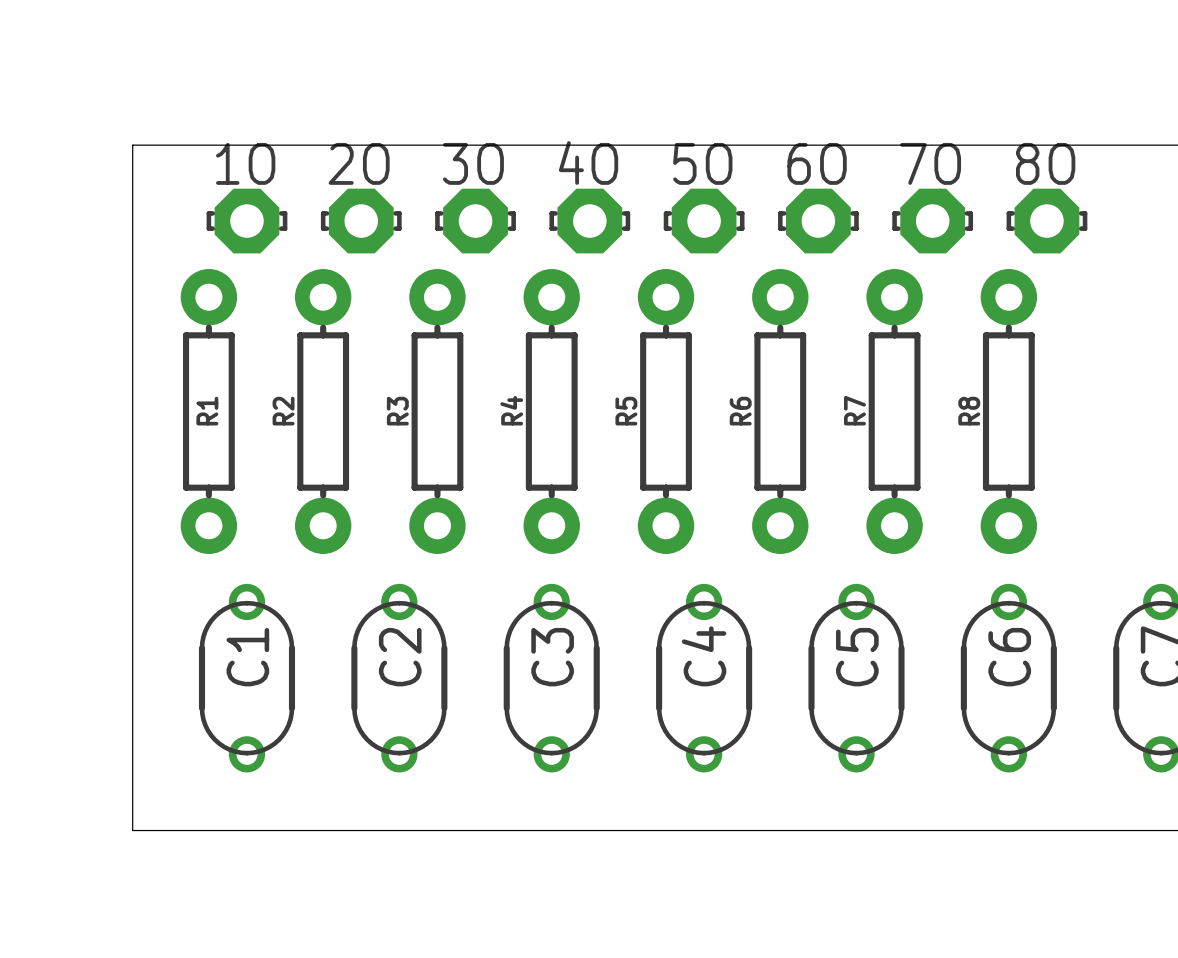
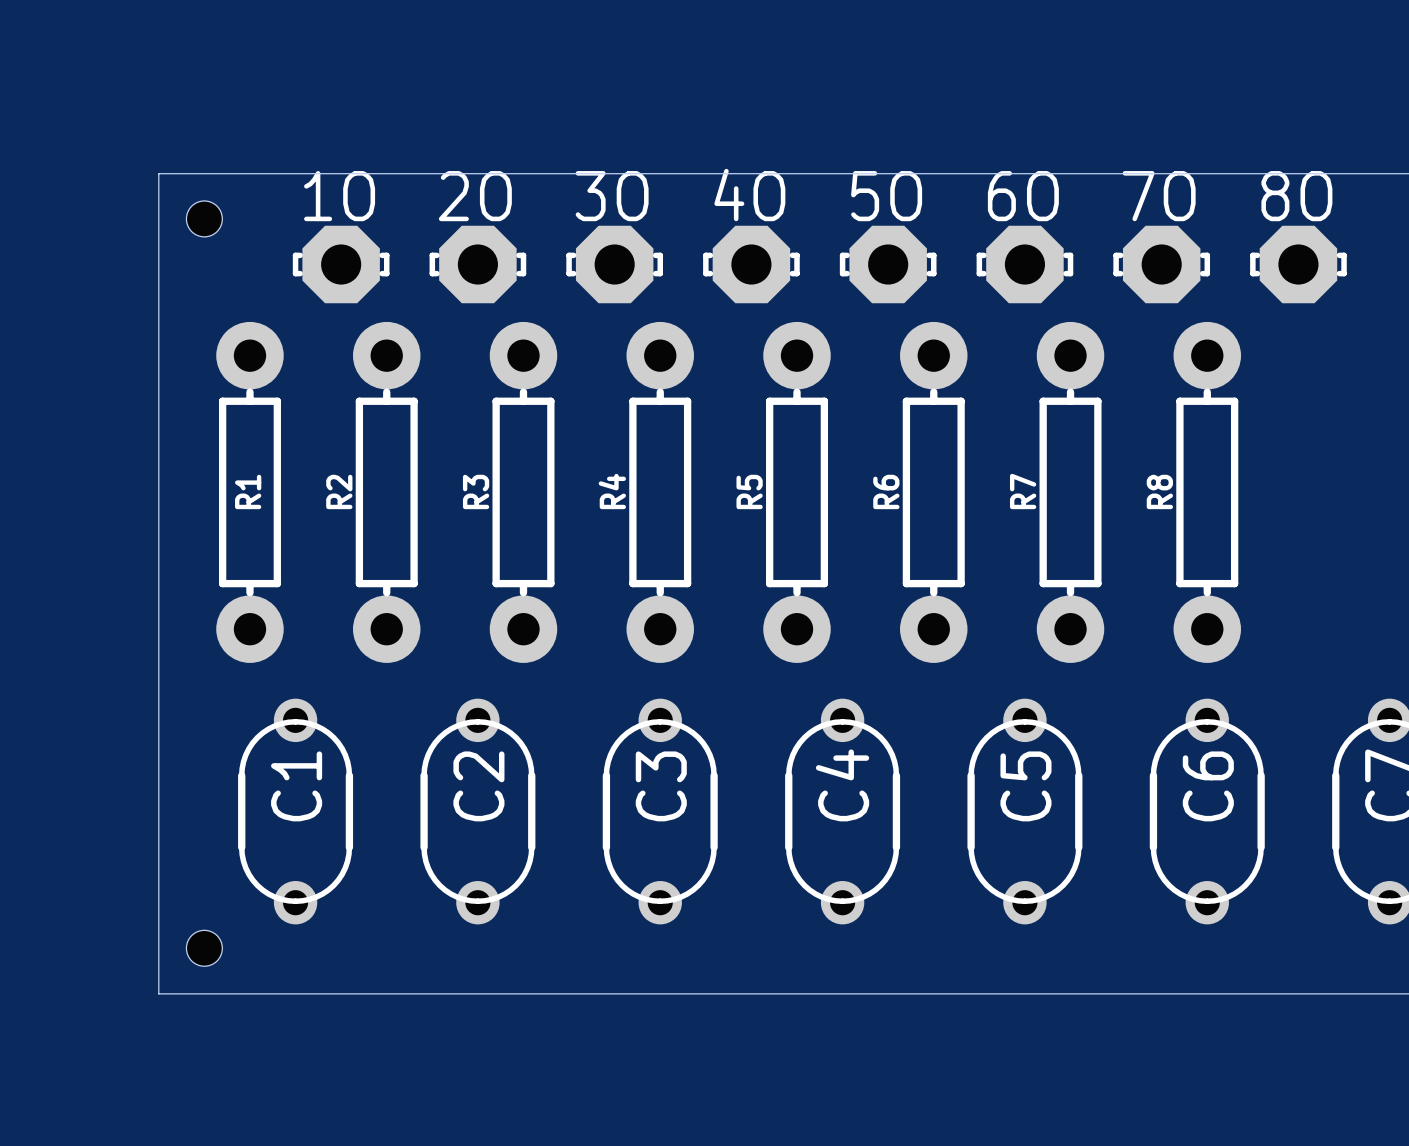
hole: none -> (204, 218)
1O position: (246, 221) -> (341, 264)
2O position: (361, 221) -> (477, 264)
3O position: (475, 221) -> (614, 264)
4O position: (589, 221) -> (751, 264)
5O position: (704, 221) -> (888, 264)
6O position: (818, 221) -> (1024, 264)
7O position: (932, 221) -> (1161, 264)
8O position: (1046, 221) -> (1298, 264)
hole: none -> (204, 948)

